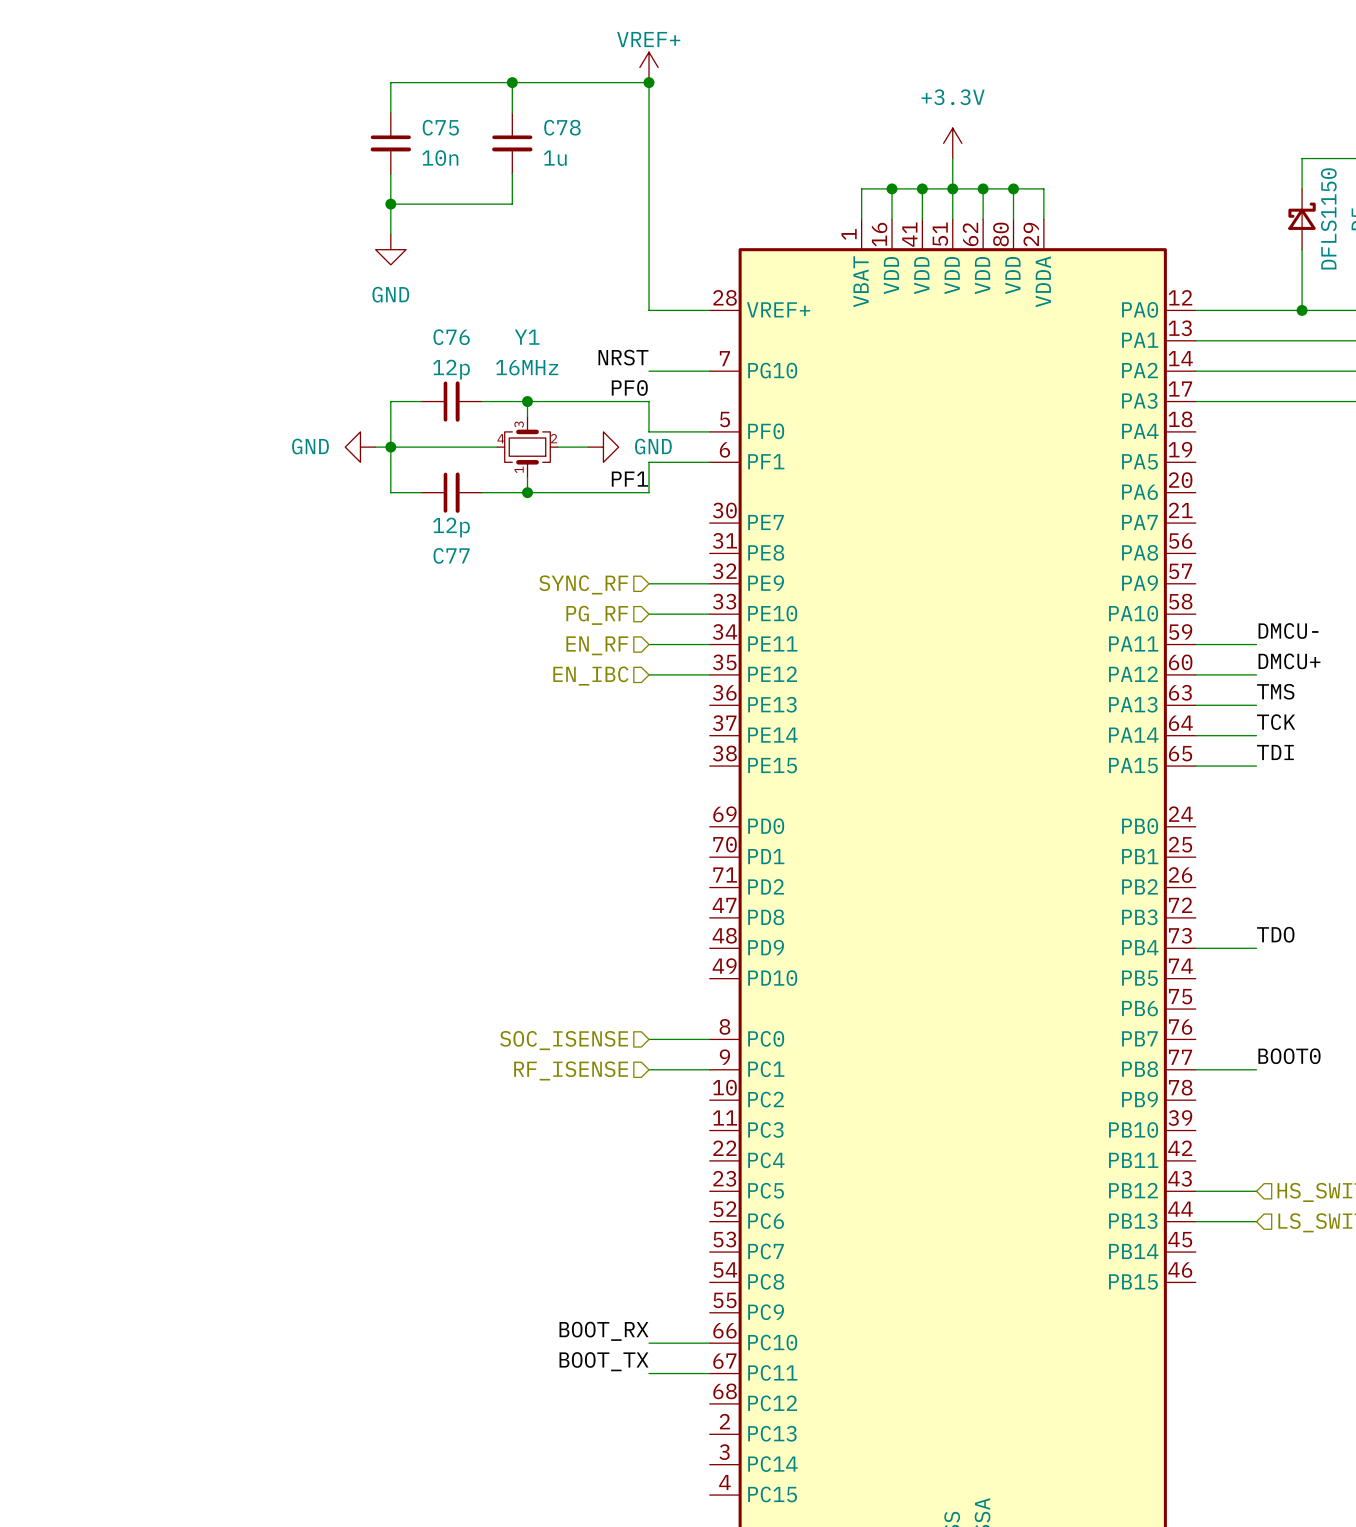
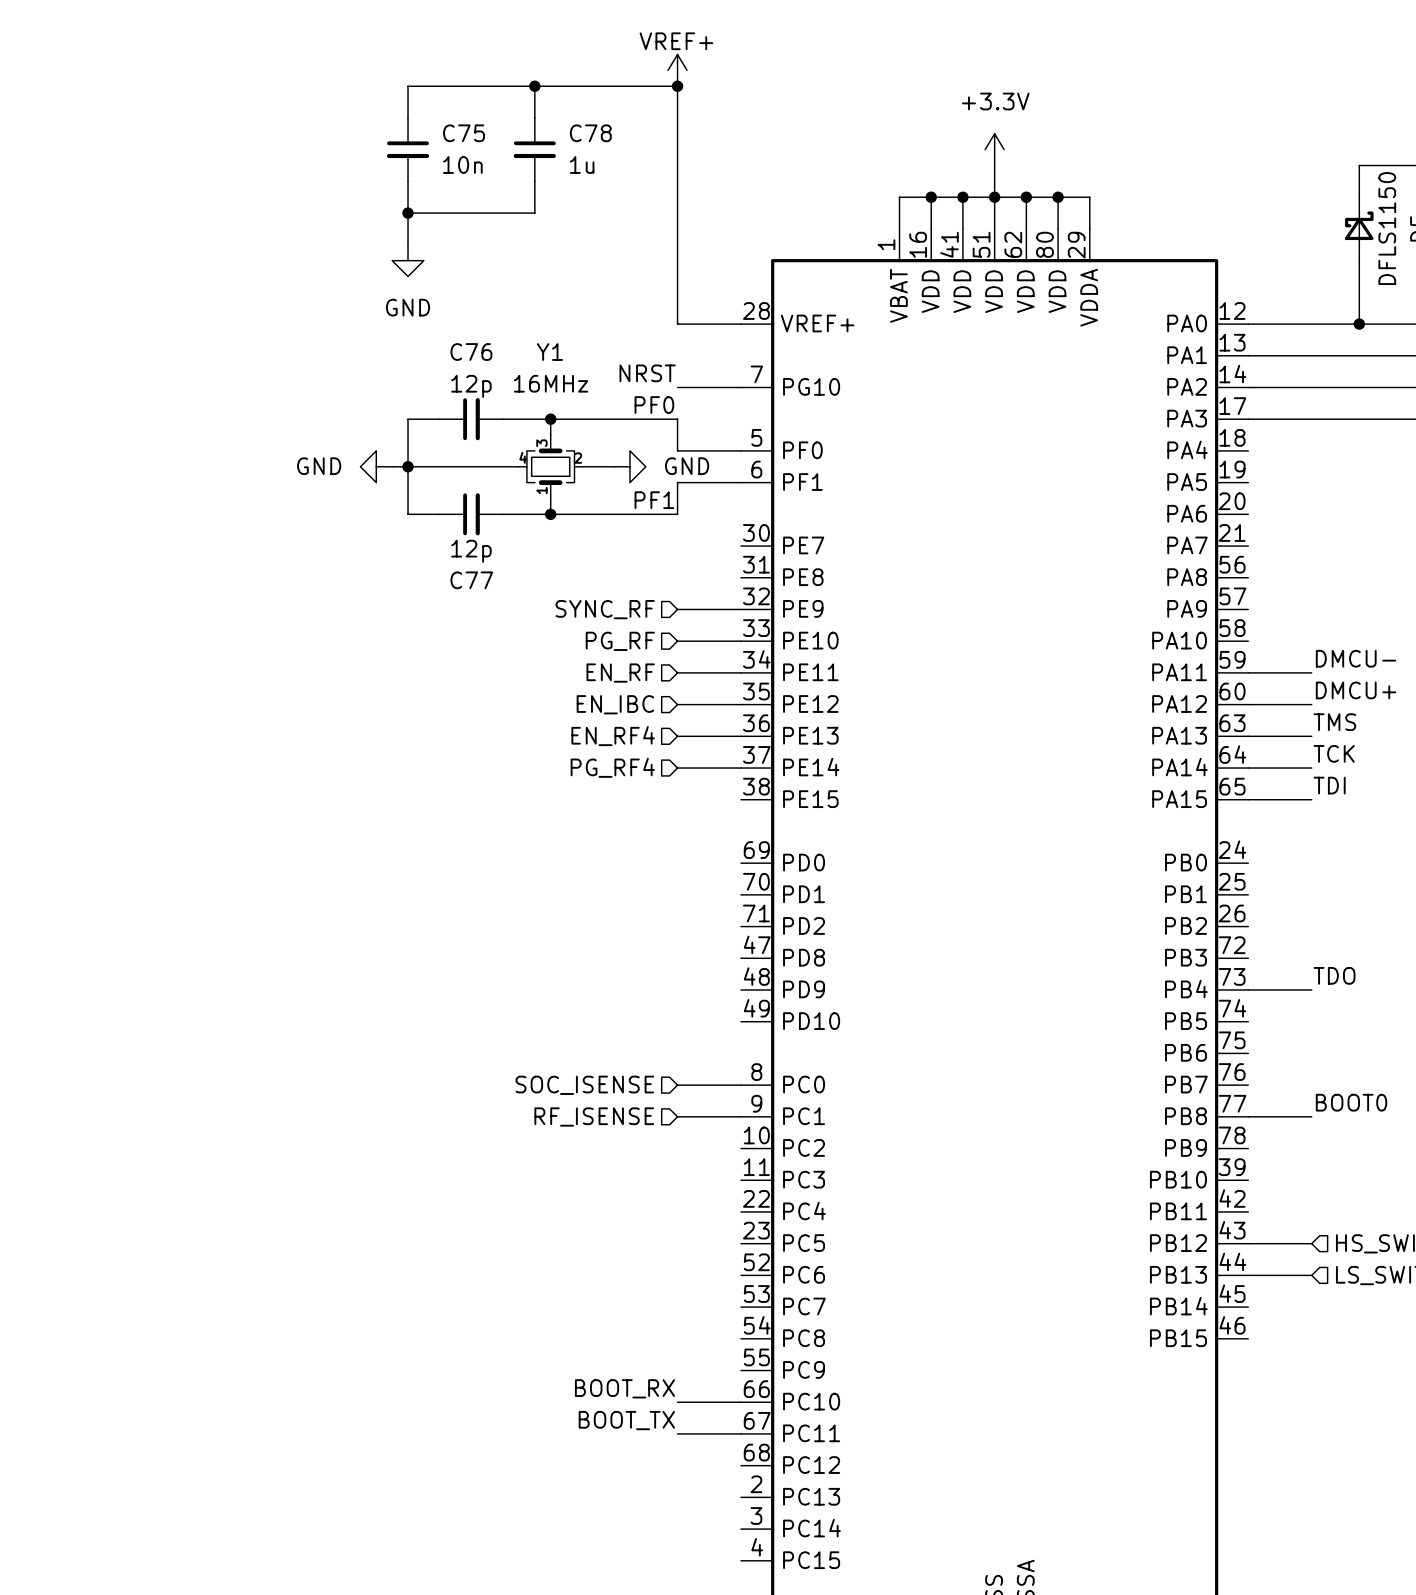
wire: none -> (677, 736) (740, 736)
hierarchical label: none -> EN_RF4 (613, 736)
wire: none -> (677, 768) (740, 768)
hierarchical label: none -> PG_RF4 (612, 767)

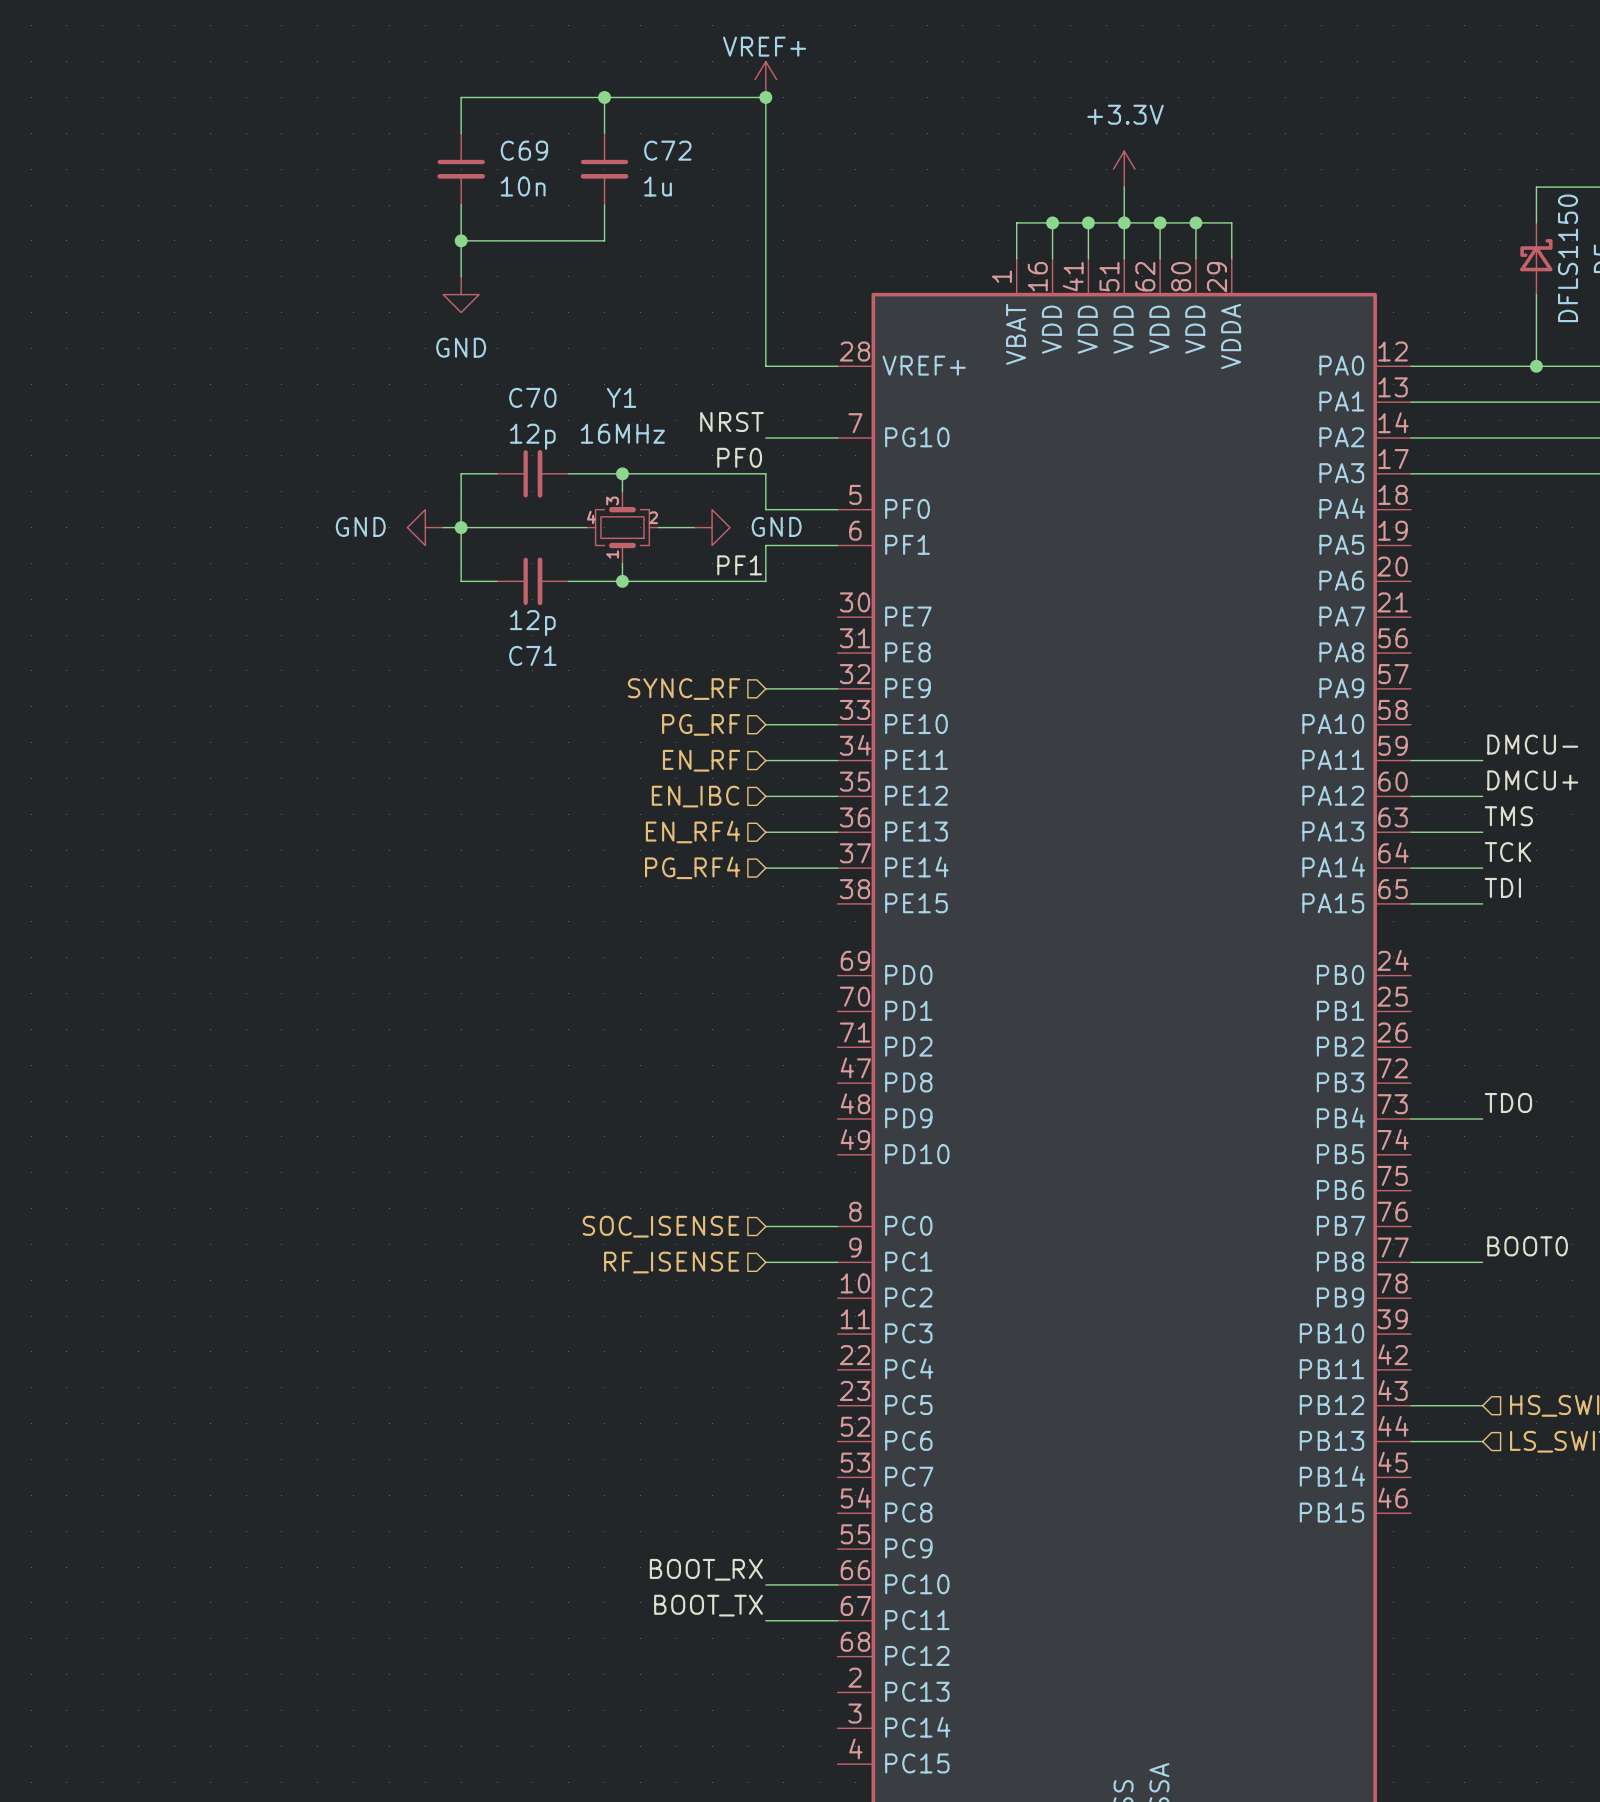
C75 name: C75 (463, 133) -> C69 (524, 150)
C78 name: C78 (590, 133) -> C72 (667, 150)
C76 name: C76 (471, 352) -> C70 (532, 397)
C77 name: C77 (471, 580) -> C71 (532, 655)

